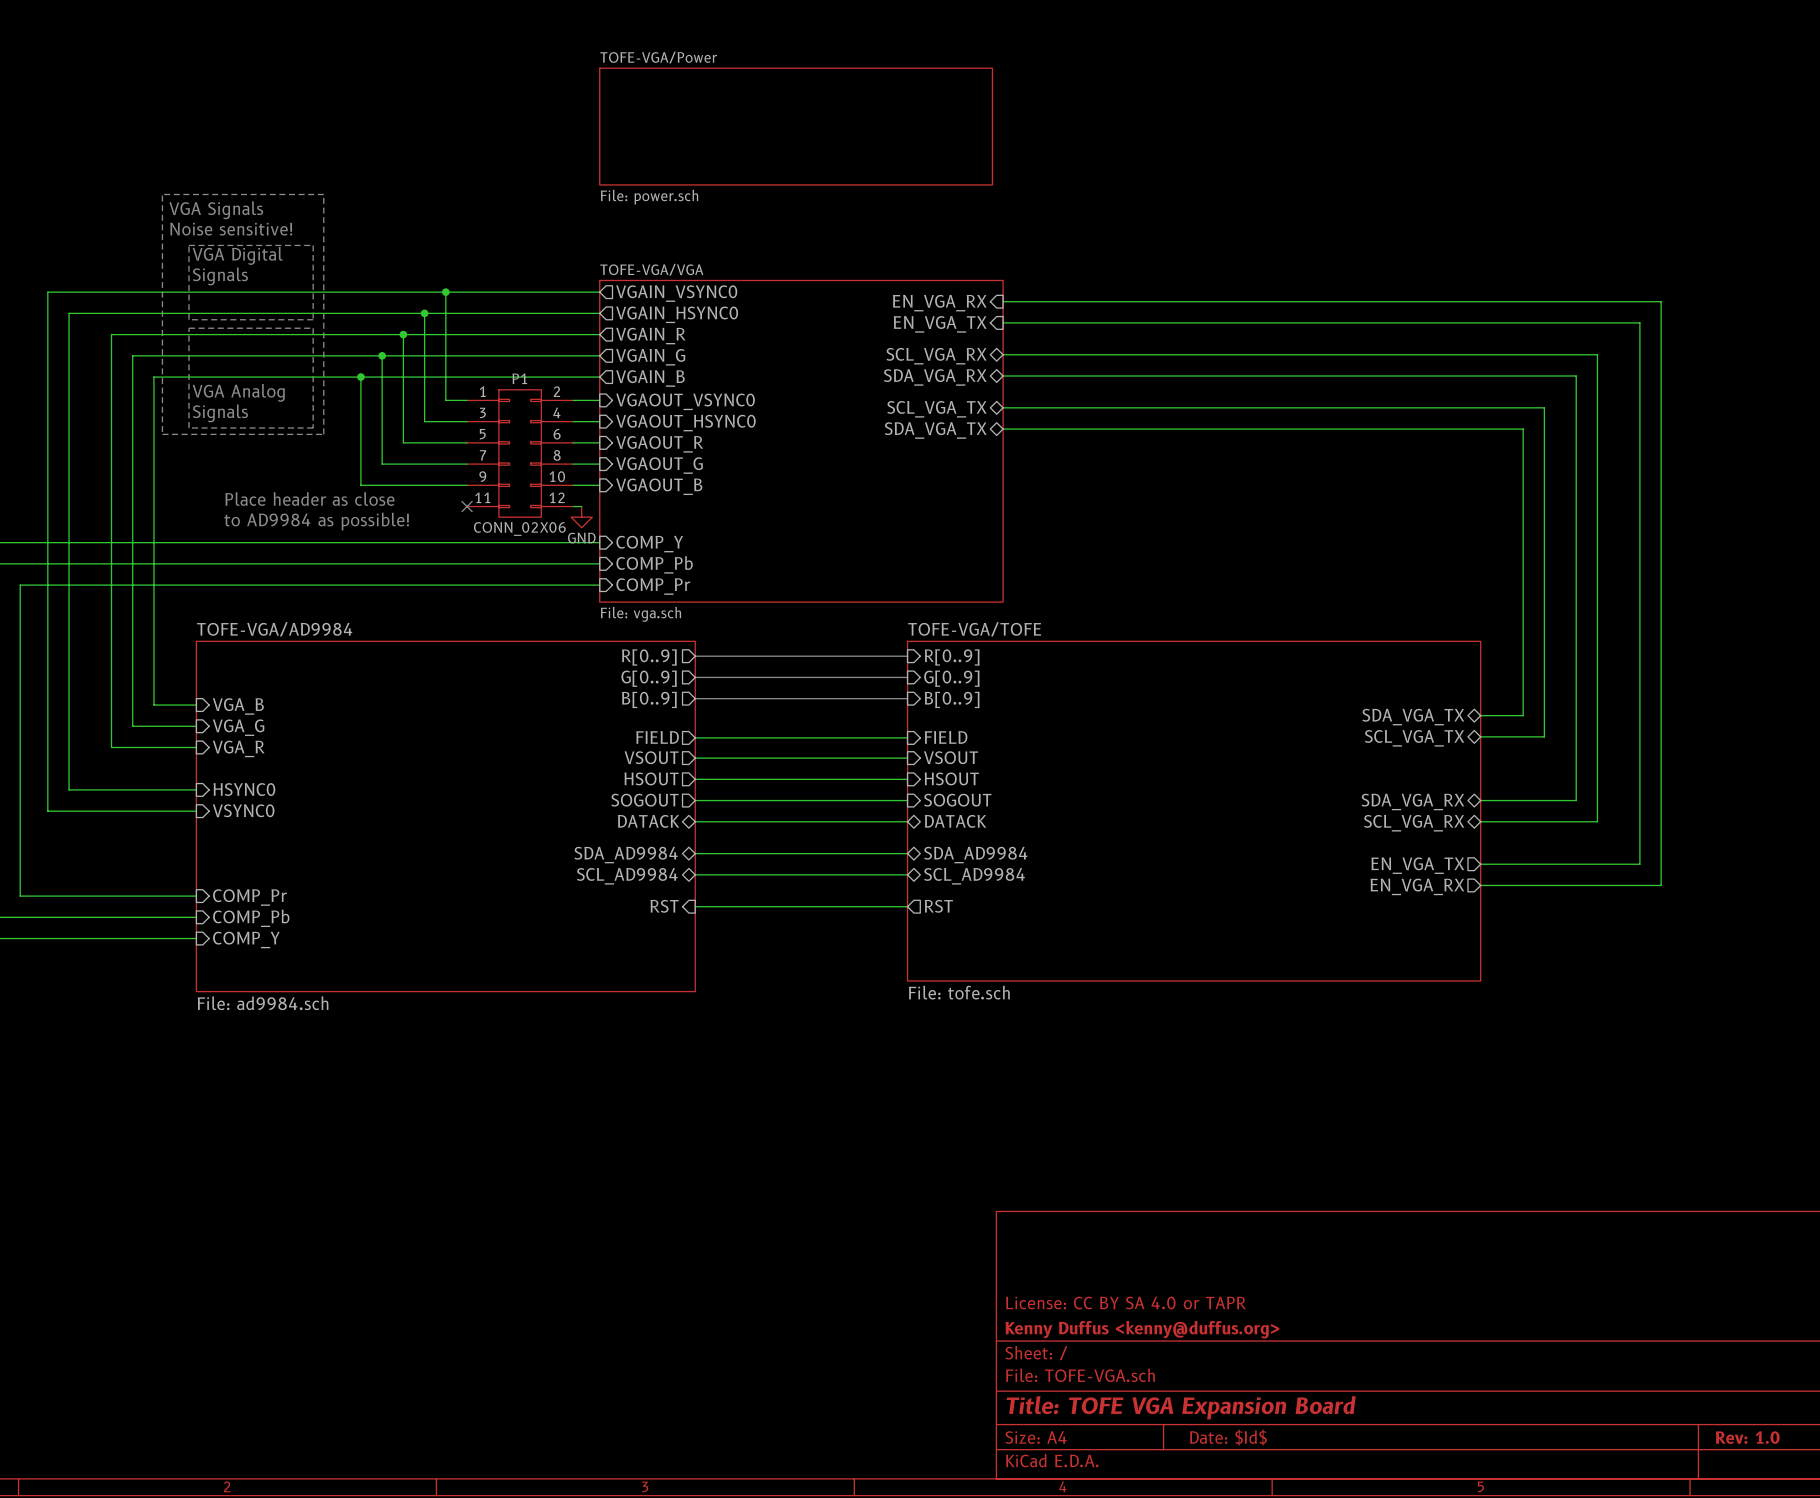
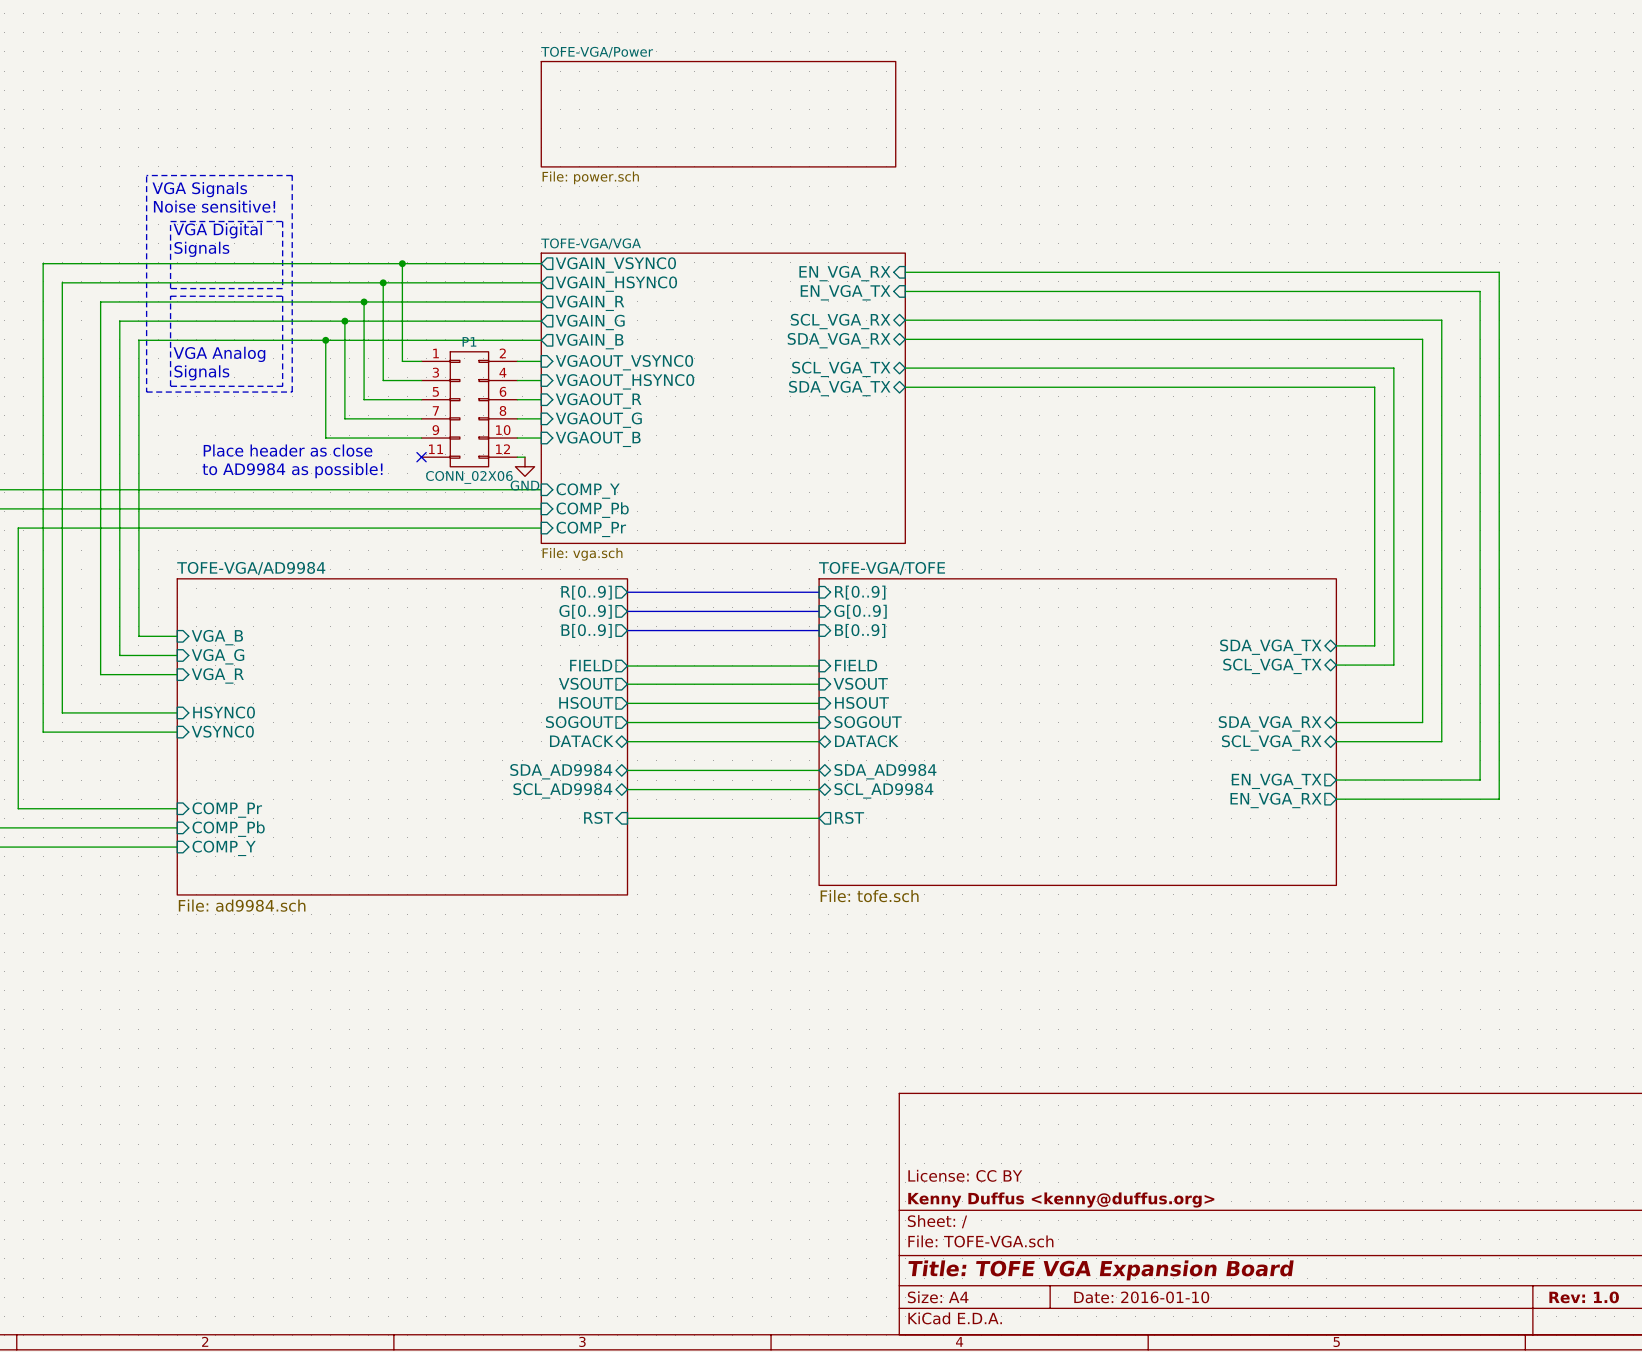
title block: License: CC BY SA 4.0 or TAPR (1125, 1303) -> License: CC BY (965, 1175)
title block: Date: $Id$ (1228, 1437) -> Date: 2016-01-10 (1141, 1297)

